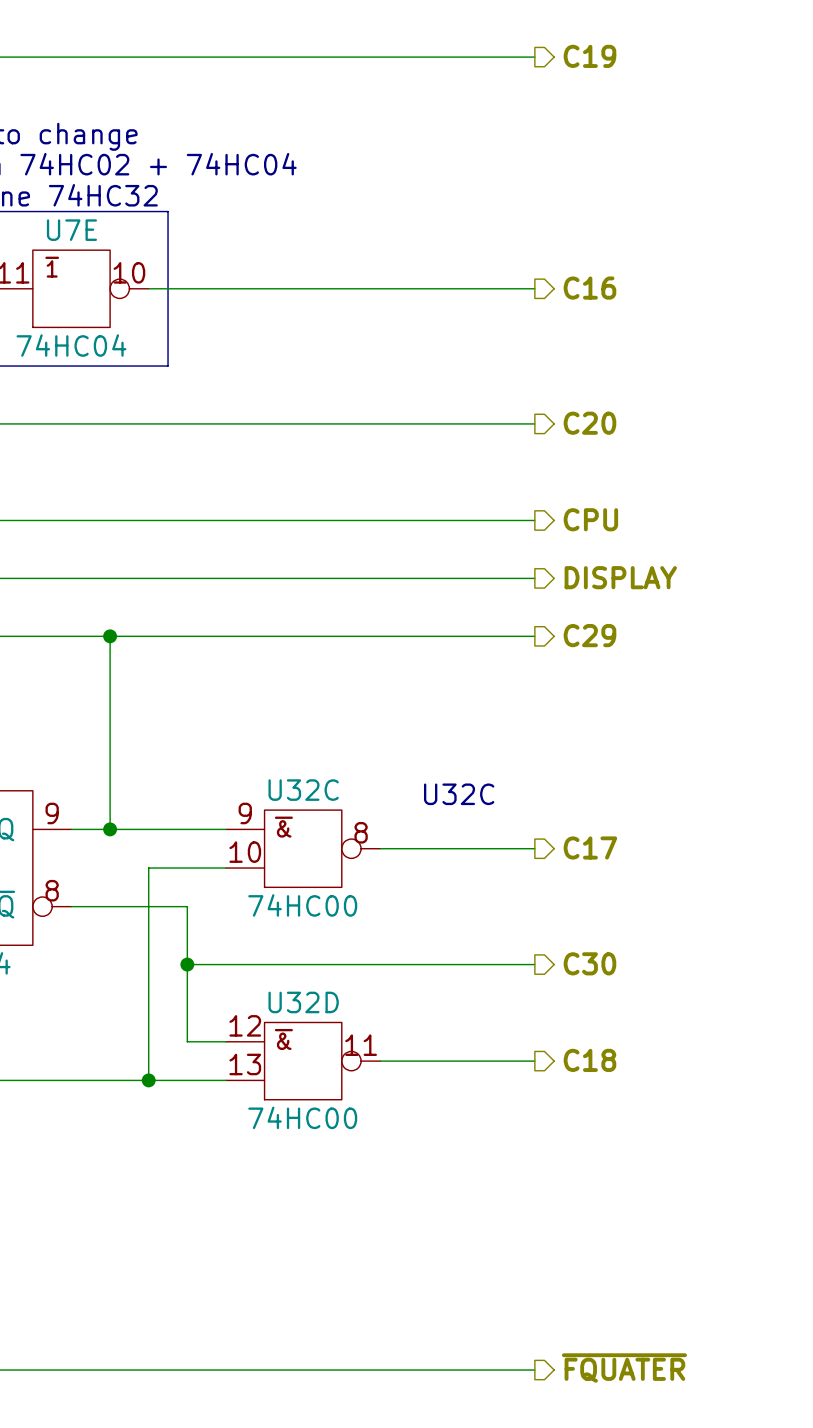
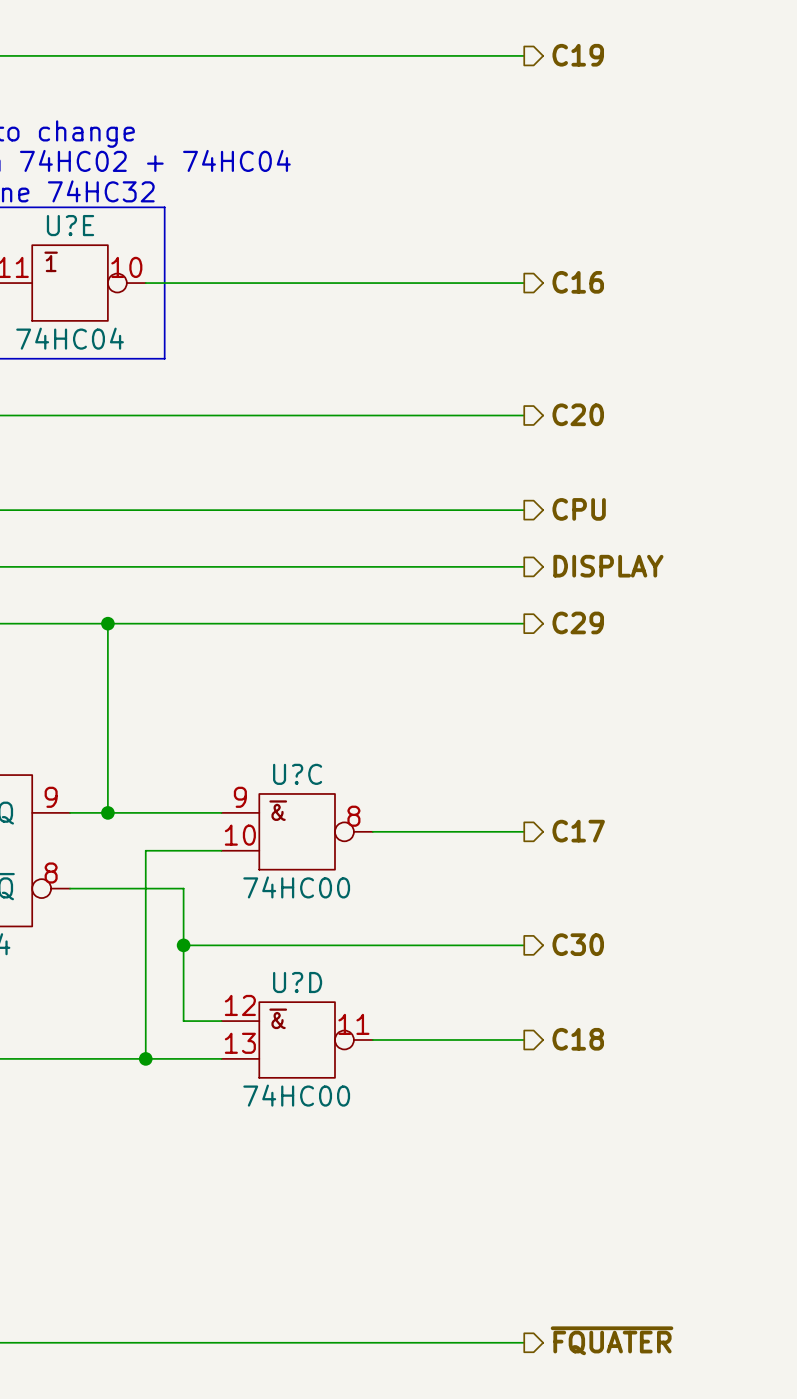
U7E name: U7E (71, 230) -> U?E (70, 225)
U32C name: U32C (303, 790) -> U?C (297, 774)
text: U32C (459, 794) -> none
U32D name: U32D (303, 1002) -> U?D (297, 982)

